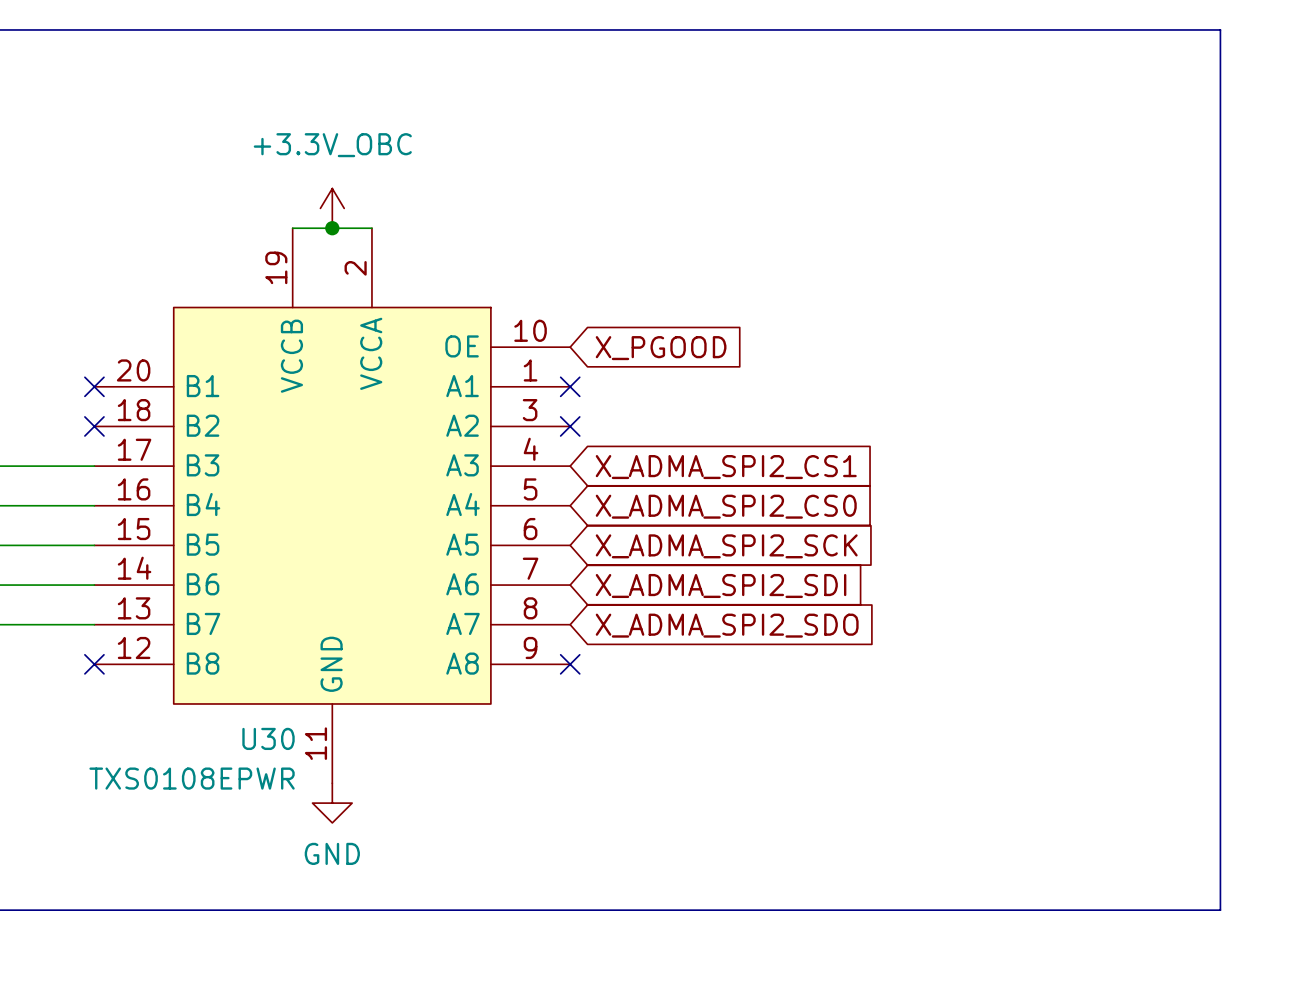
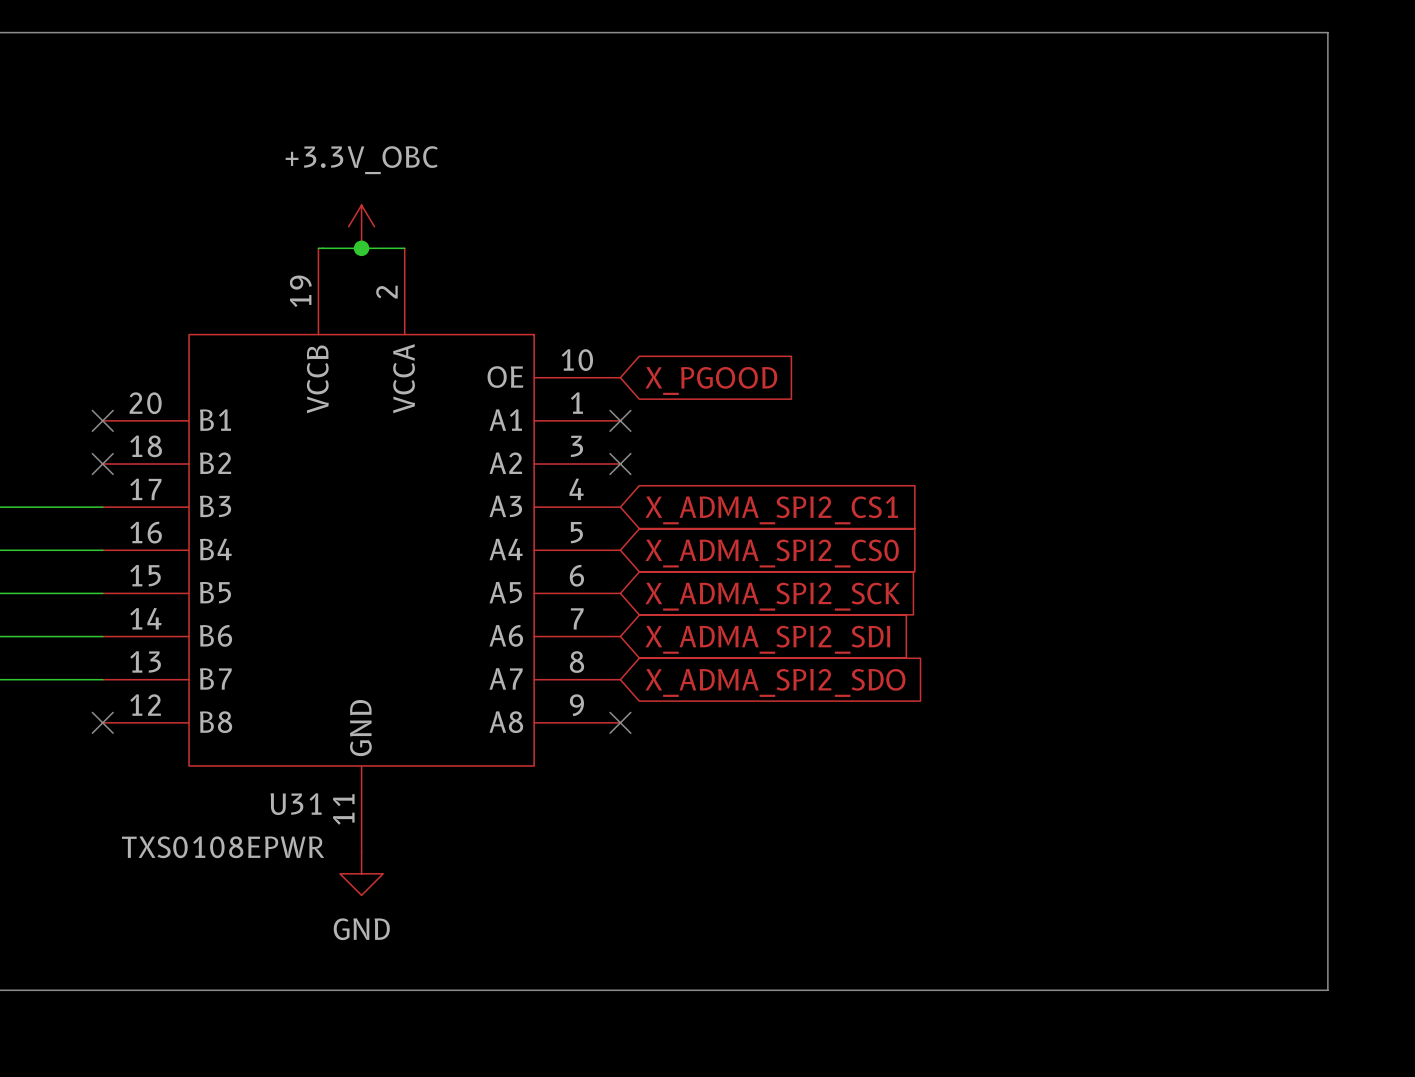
U30 name: U30 (268, 738) -> U31 (296, 804)

